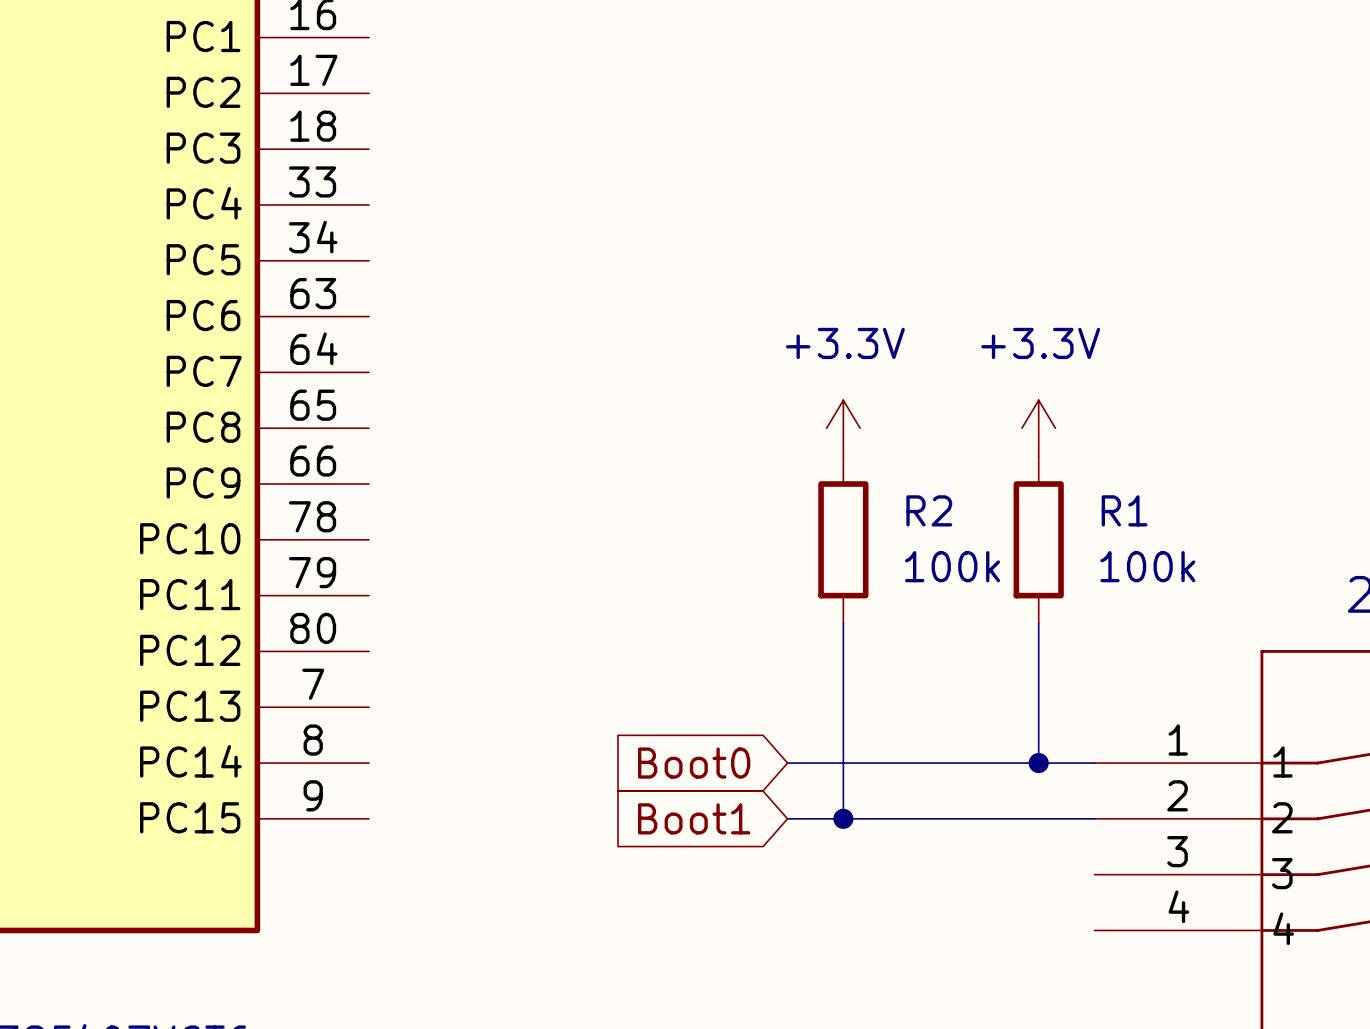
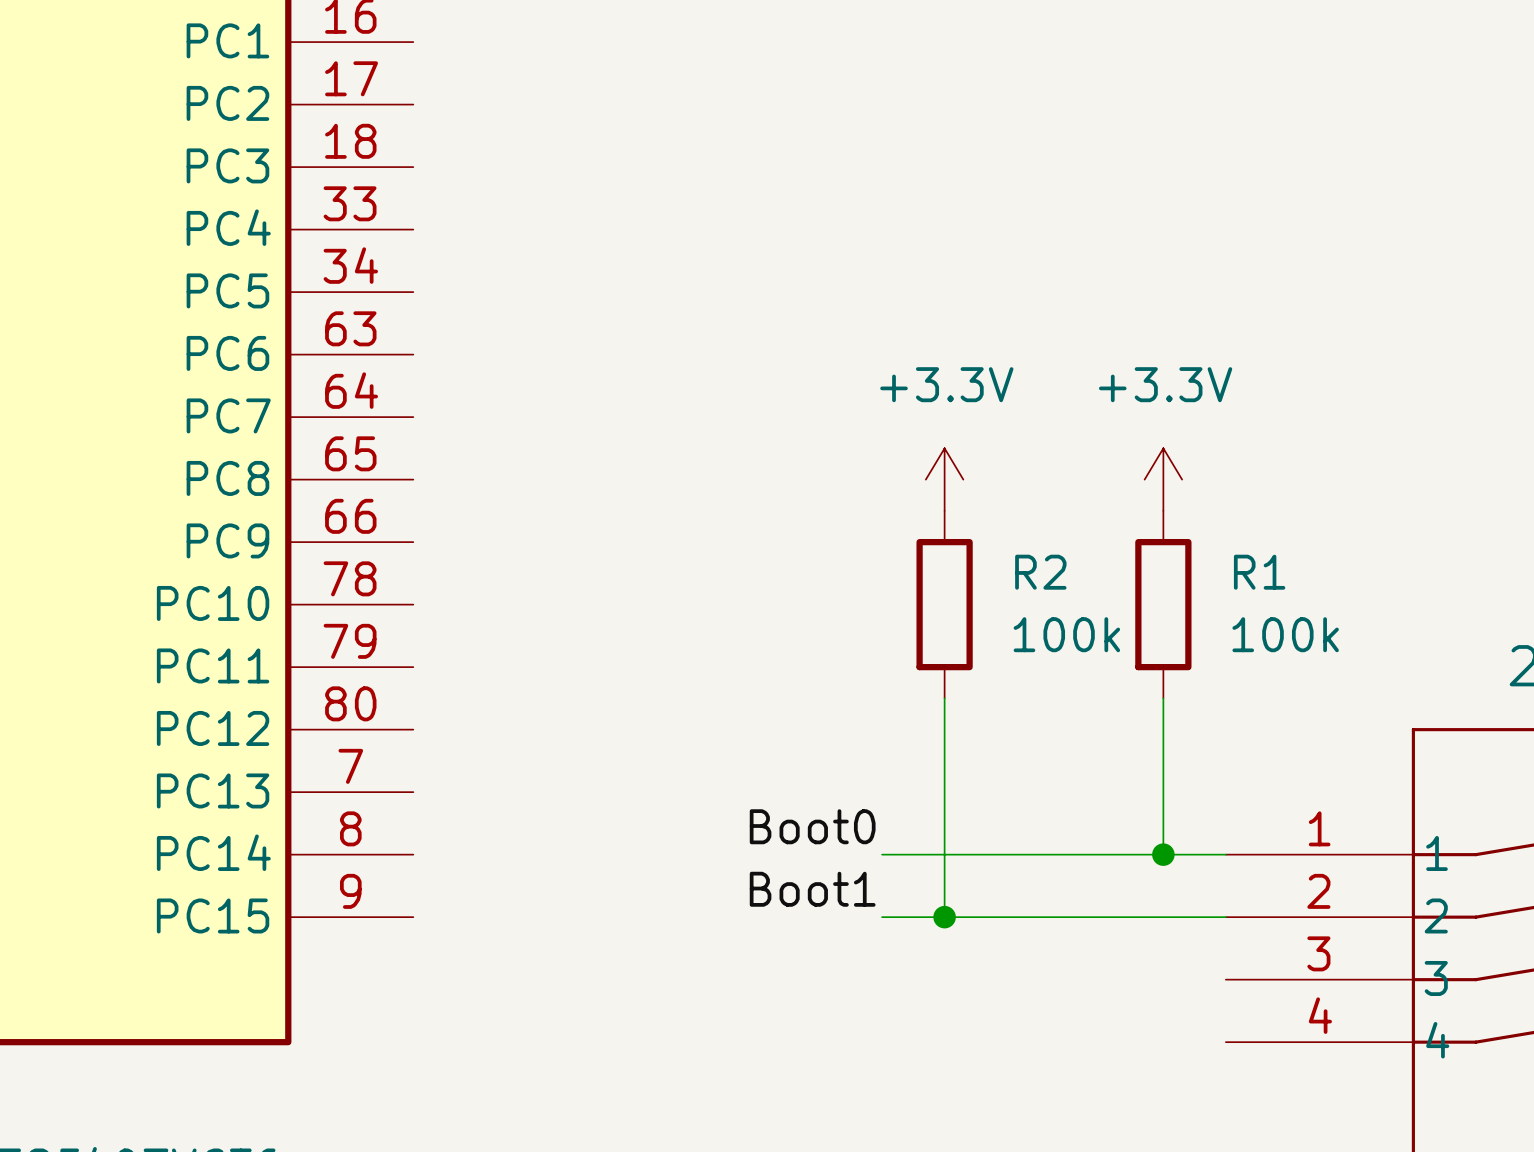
label: none -> Boot0 (812, 826)
global label: Boot0 (694, 763) -> none
label: none -> Boot1 (812, 889)
global label: Boot1 (694, 818) -> none

